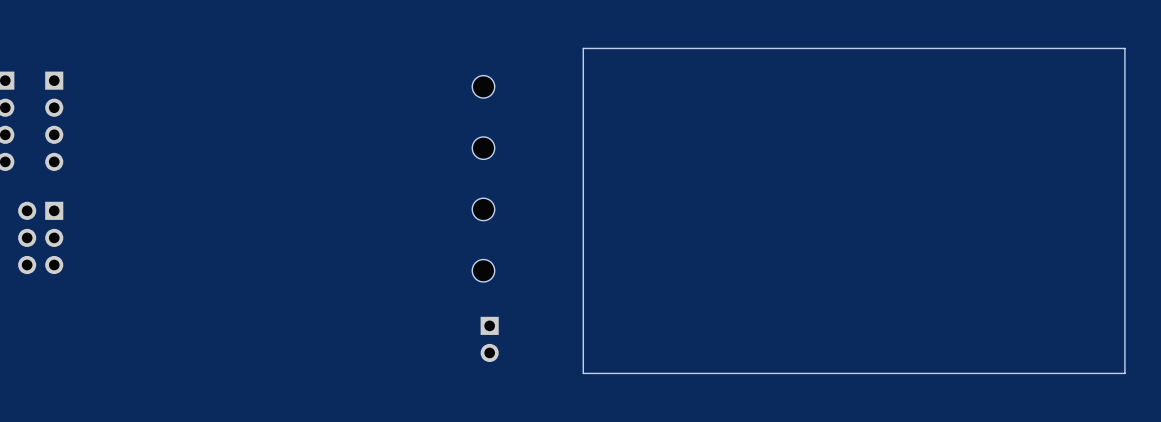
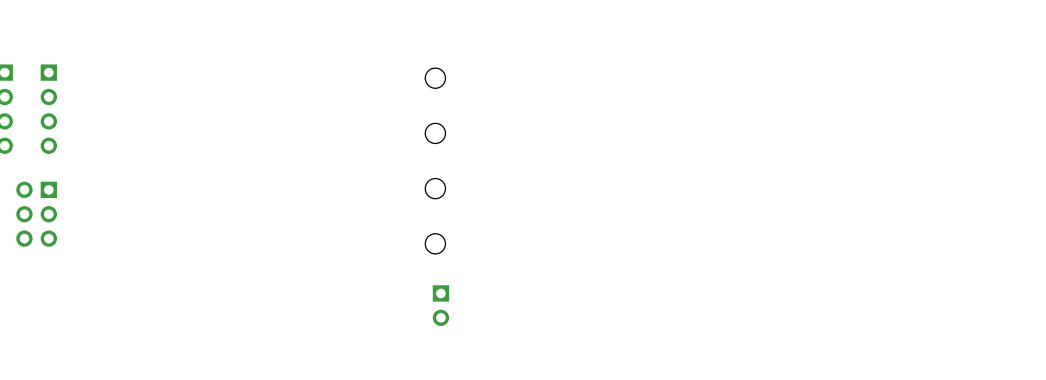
board edge: (1124, 48) (583, 48) (583, 373) (1124, 373) (1124, 48) -> none

